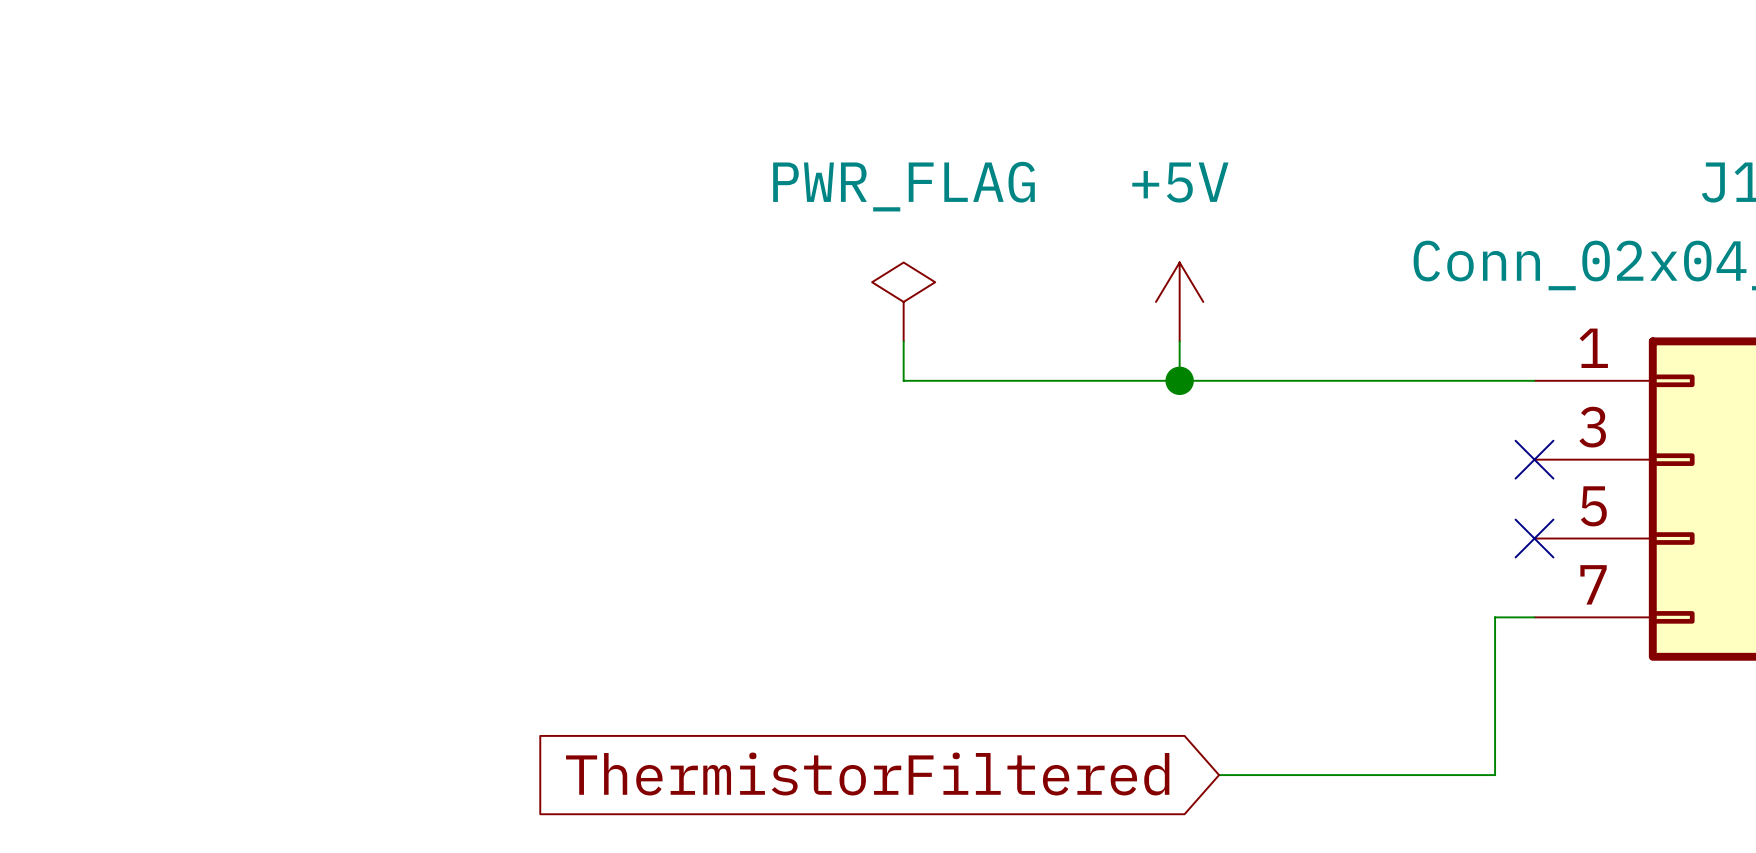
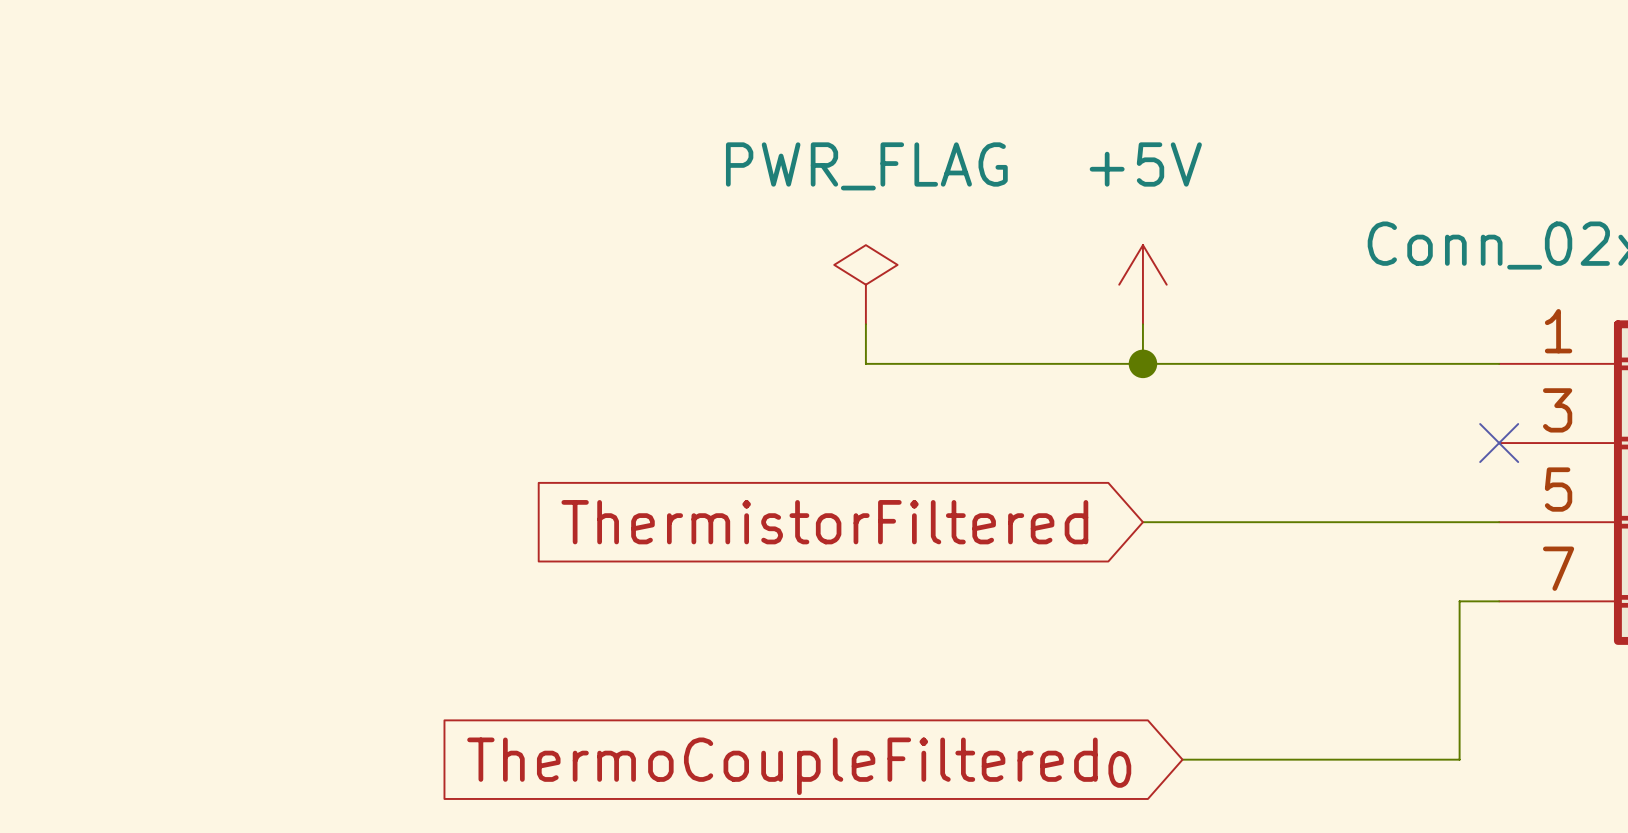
global label: none -> ThermistorFiltered (824, 522)
wire: none -> (1142, 522) (1499, 522)
no-connect mark: (1534, 538) -> none
global label: ThermistorFiltered (867, 774) -> ThermoCoupleFiltered0 (799, 766)

